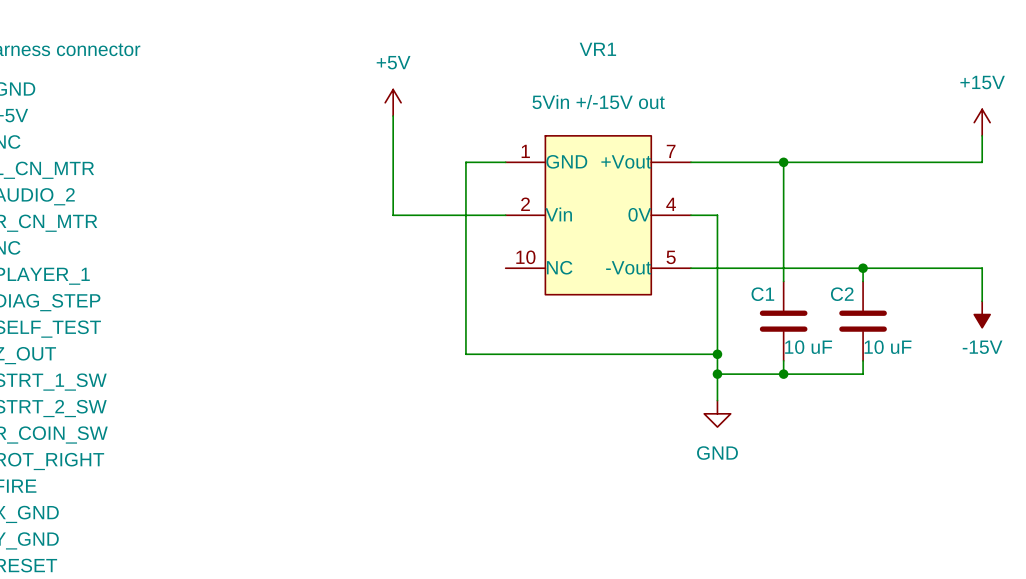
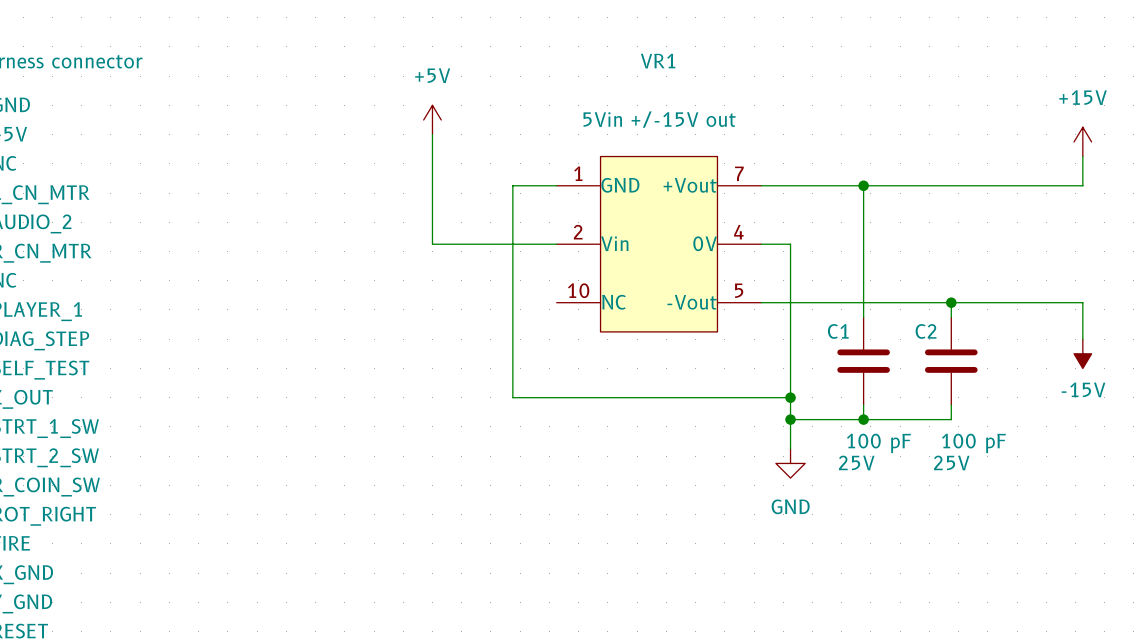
C1 text: 10 uF (808, 347) -> 100 pF (878, 443)
C2 text: 10 uF (888, 347) -> 100 pF (973, 443)
C2 text: none -> 25V (856, 463)
C1 text: none -> 25V (951, 463)

